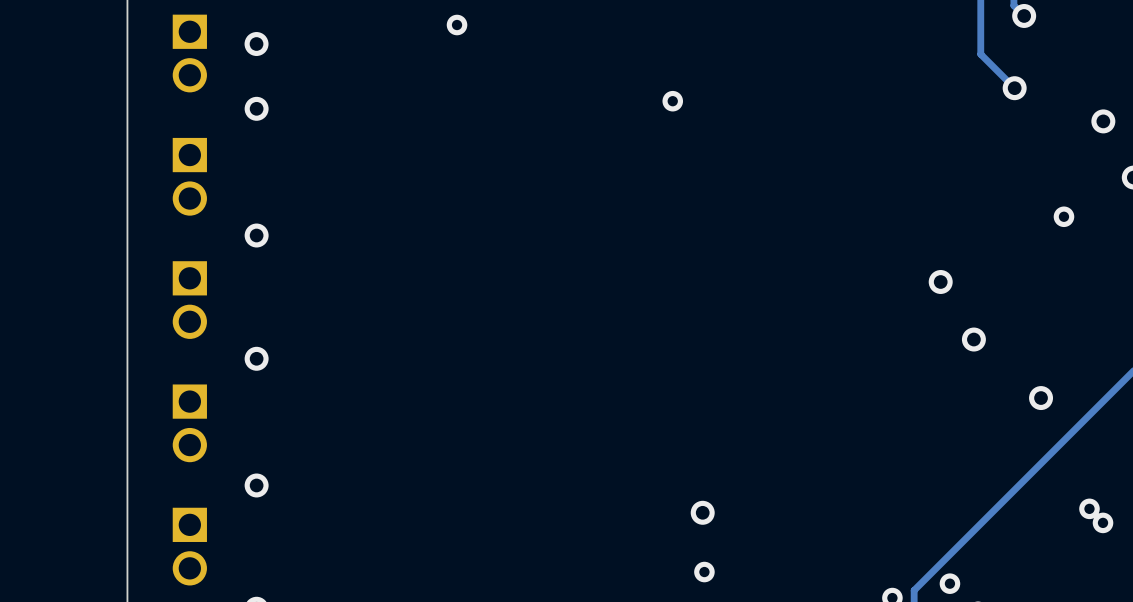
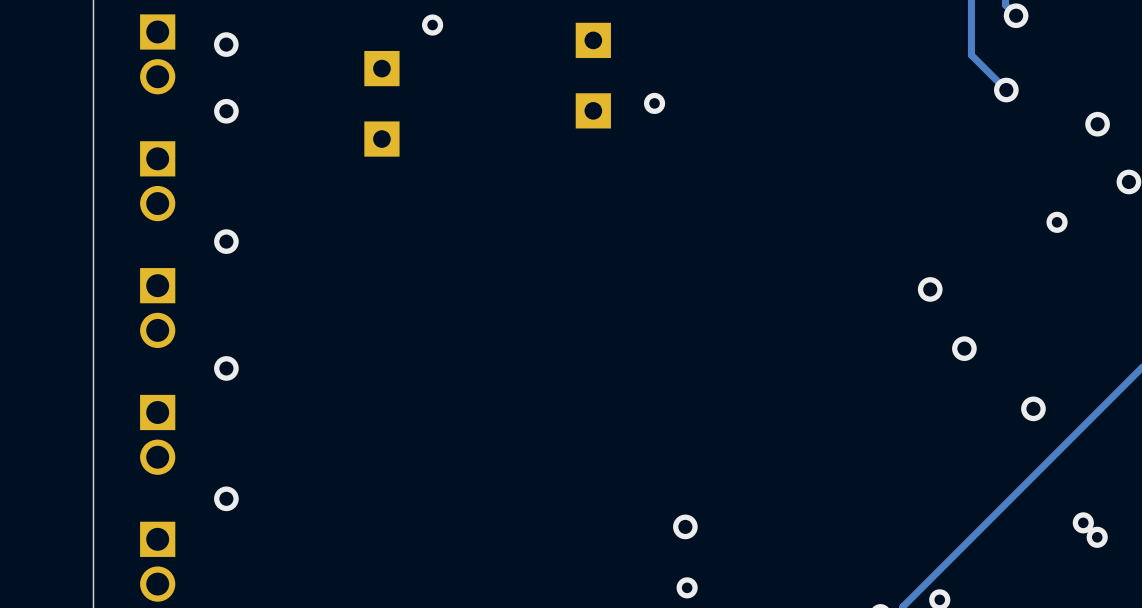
part: none -> (593, 40)
part: none -> (381, 68)
part: none -> (593, 110)
part: none -> (381, 139)

